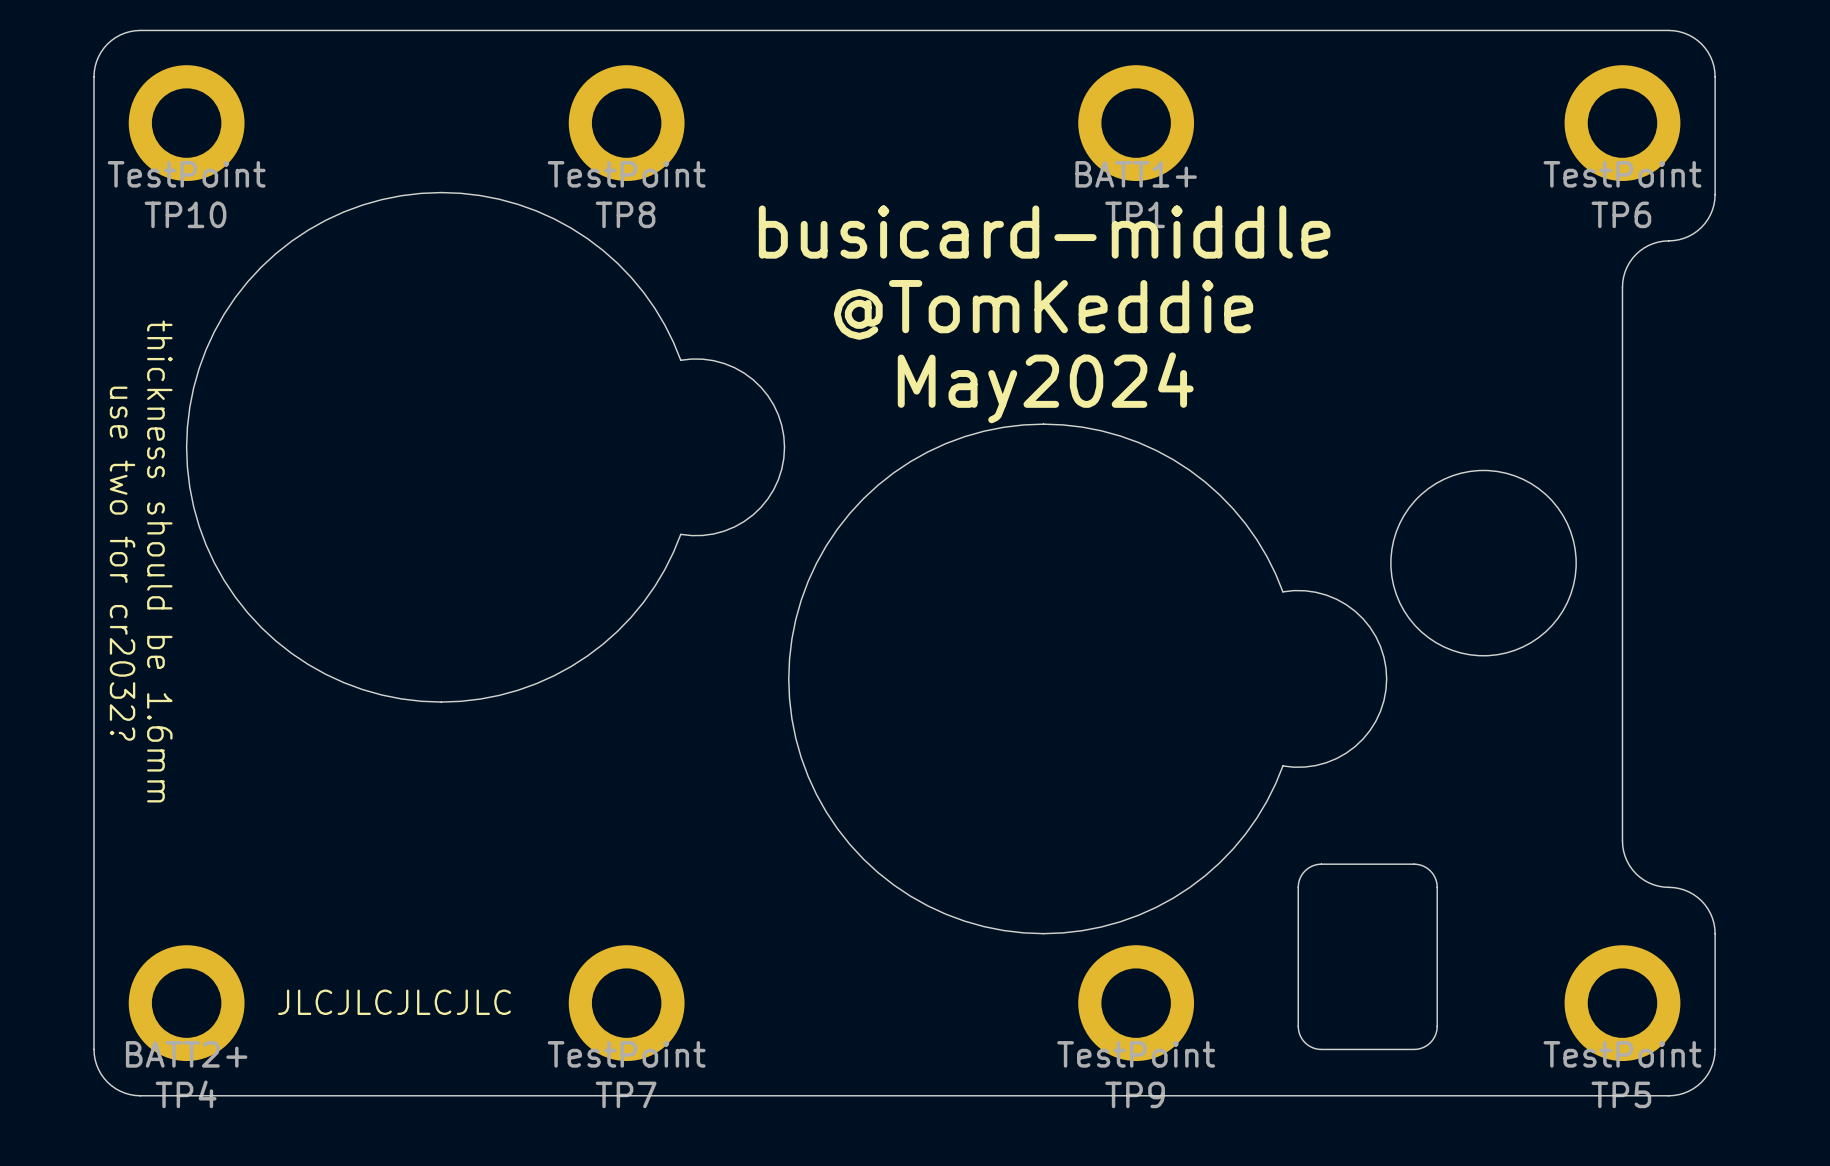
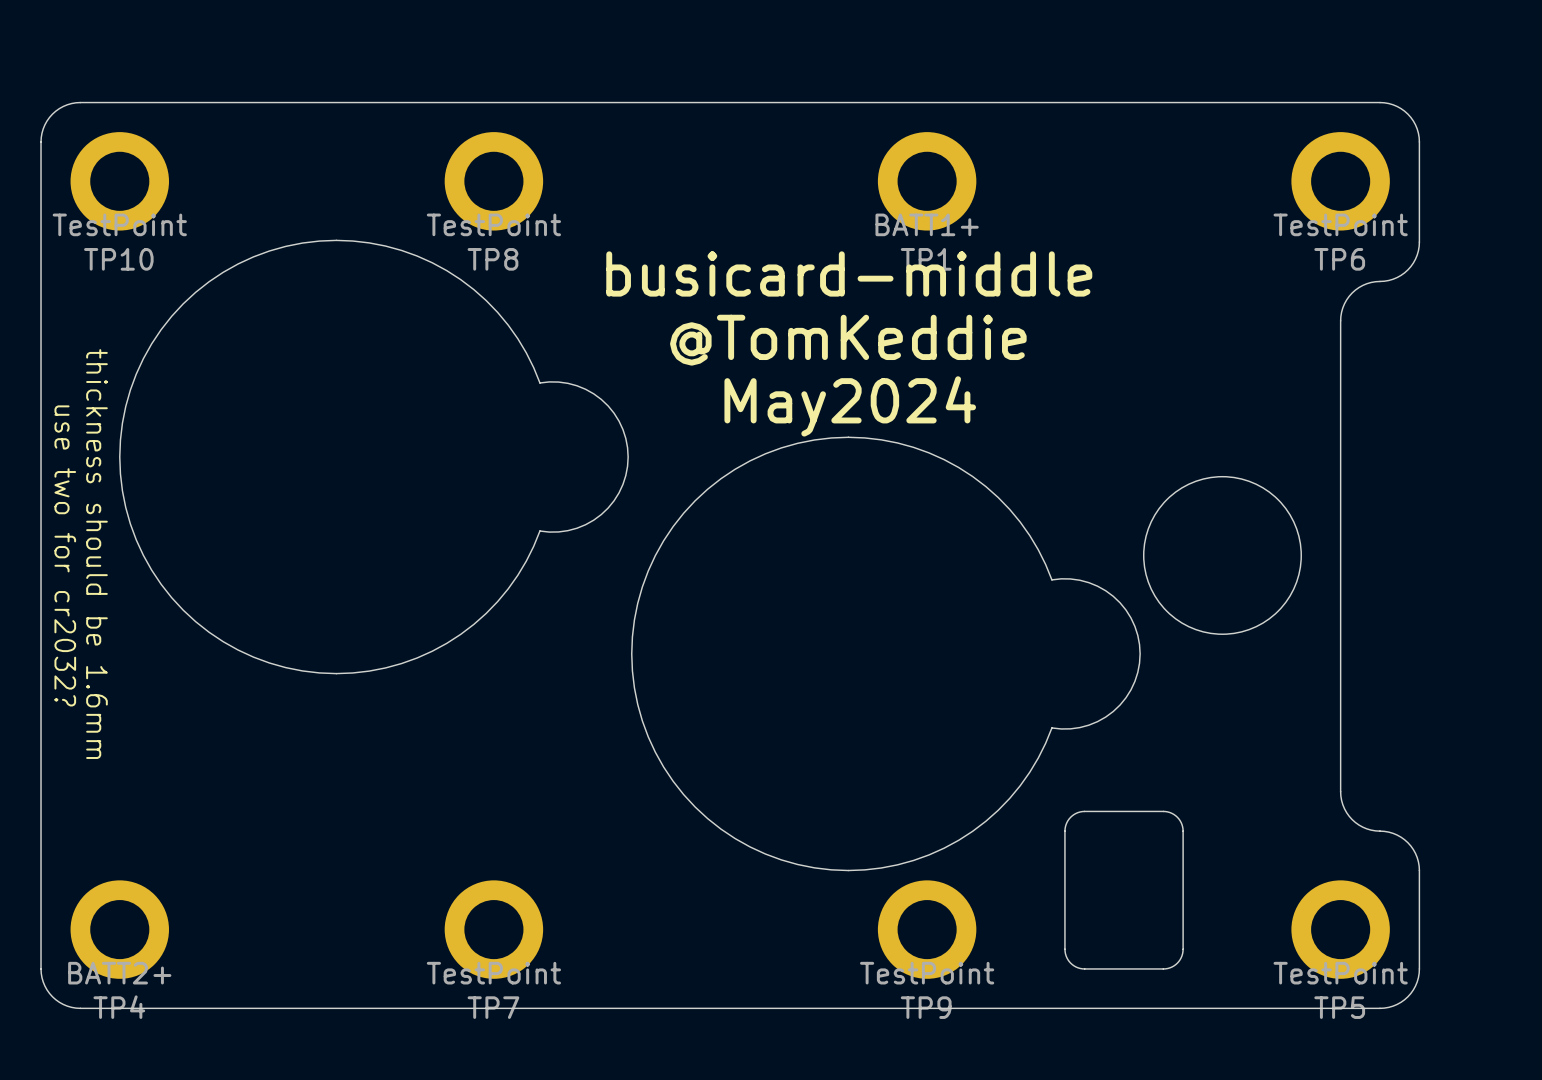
text: JLCJLCJLCJLC (394, 1002) -> none

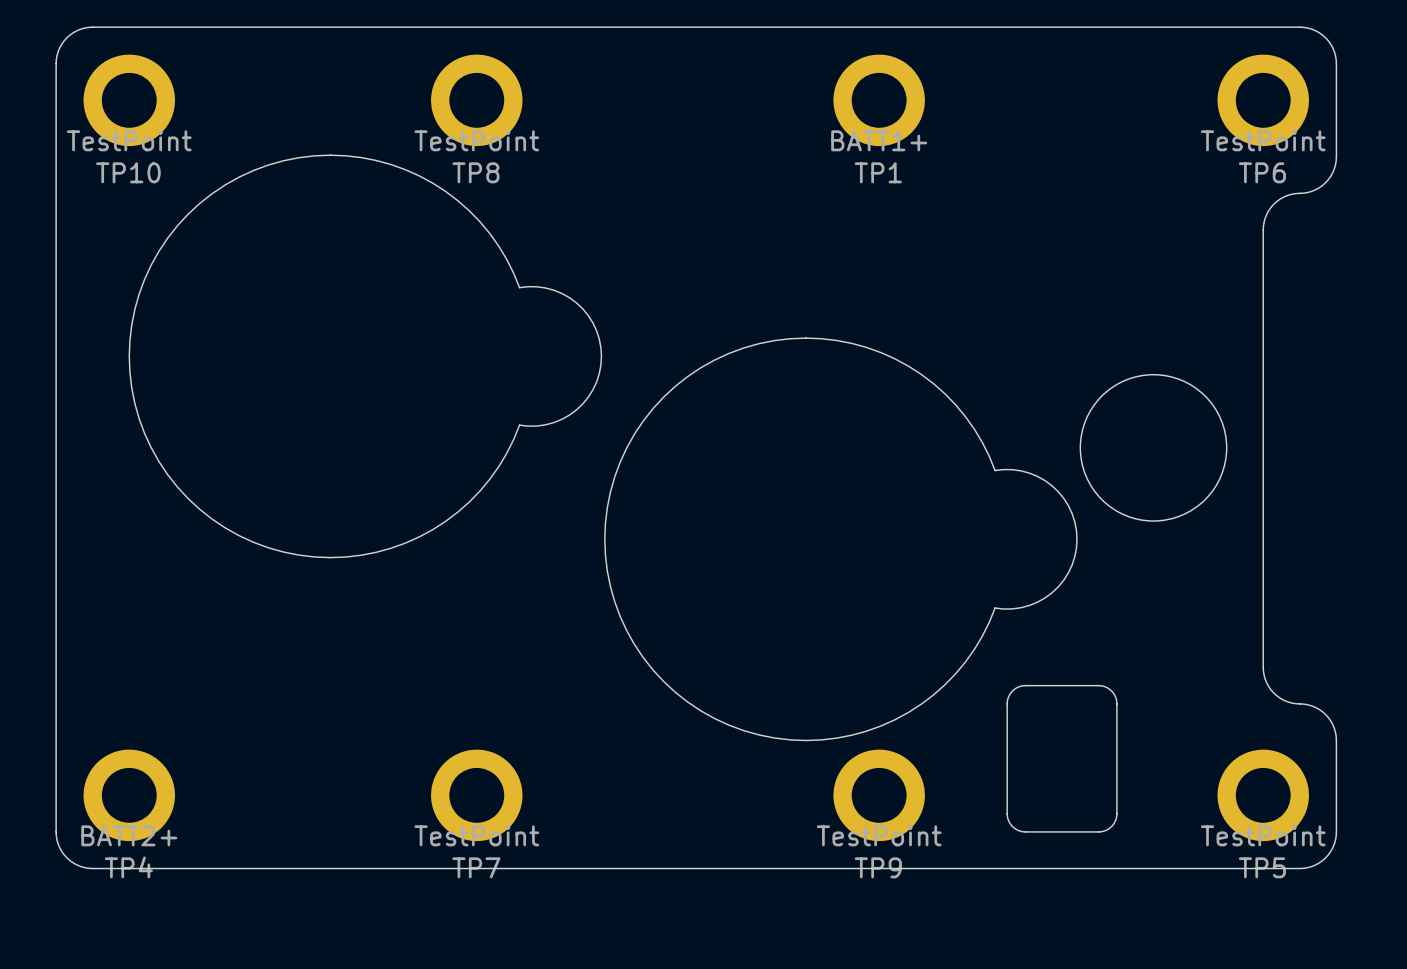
text: busicard-middle (849, 273) -> none
text: @TomKeddie (848, 340) -> none
text: May2024 (850, 406) -> none
text: thickness should be 1.6mm (96, 554) -> none
text: use two for cr2032? (65, 555) -> none

